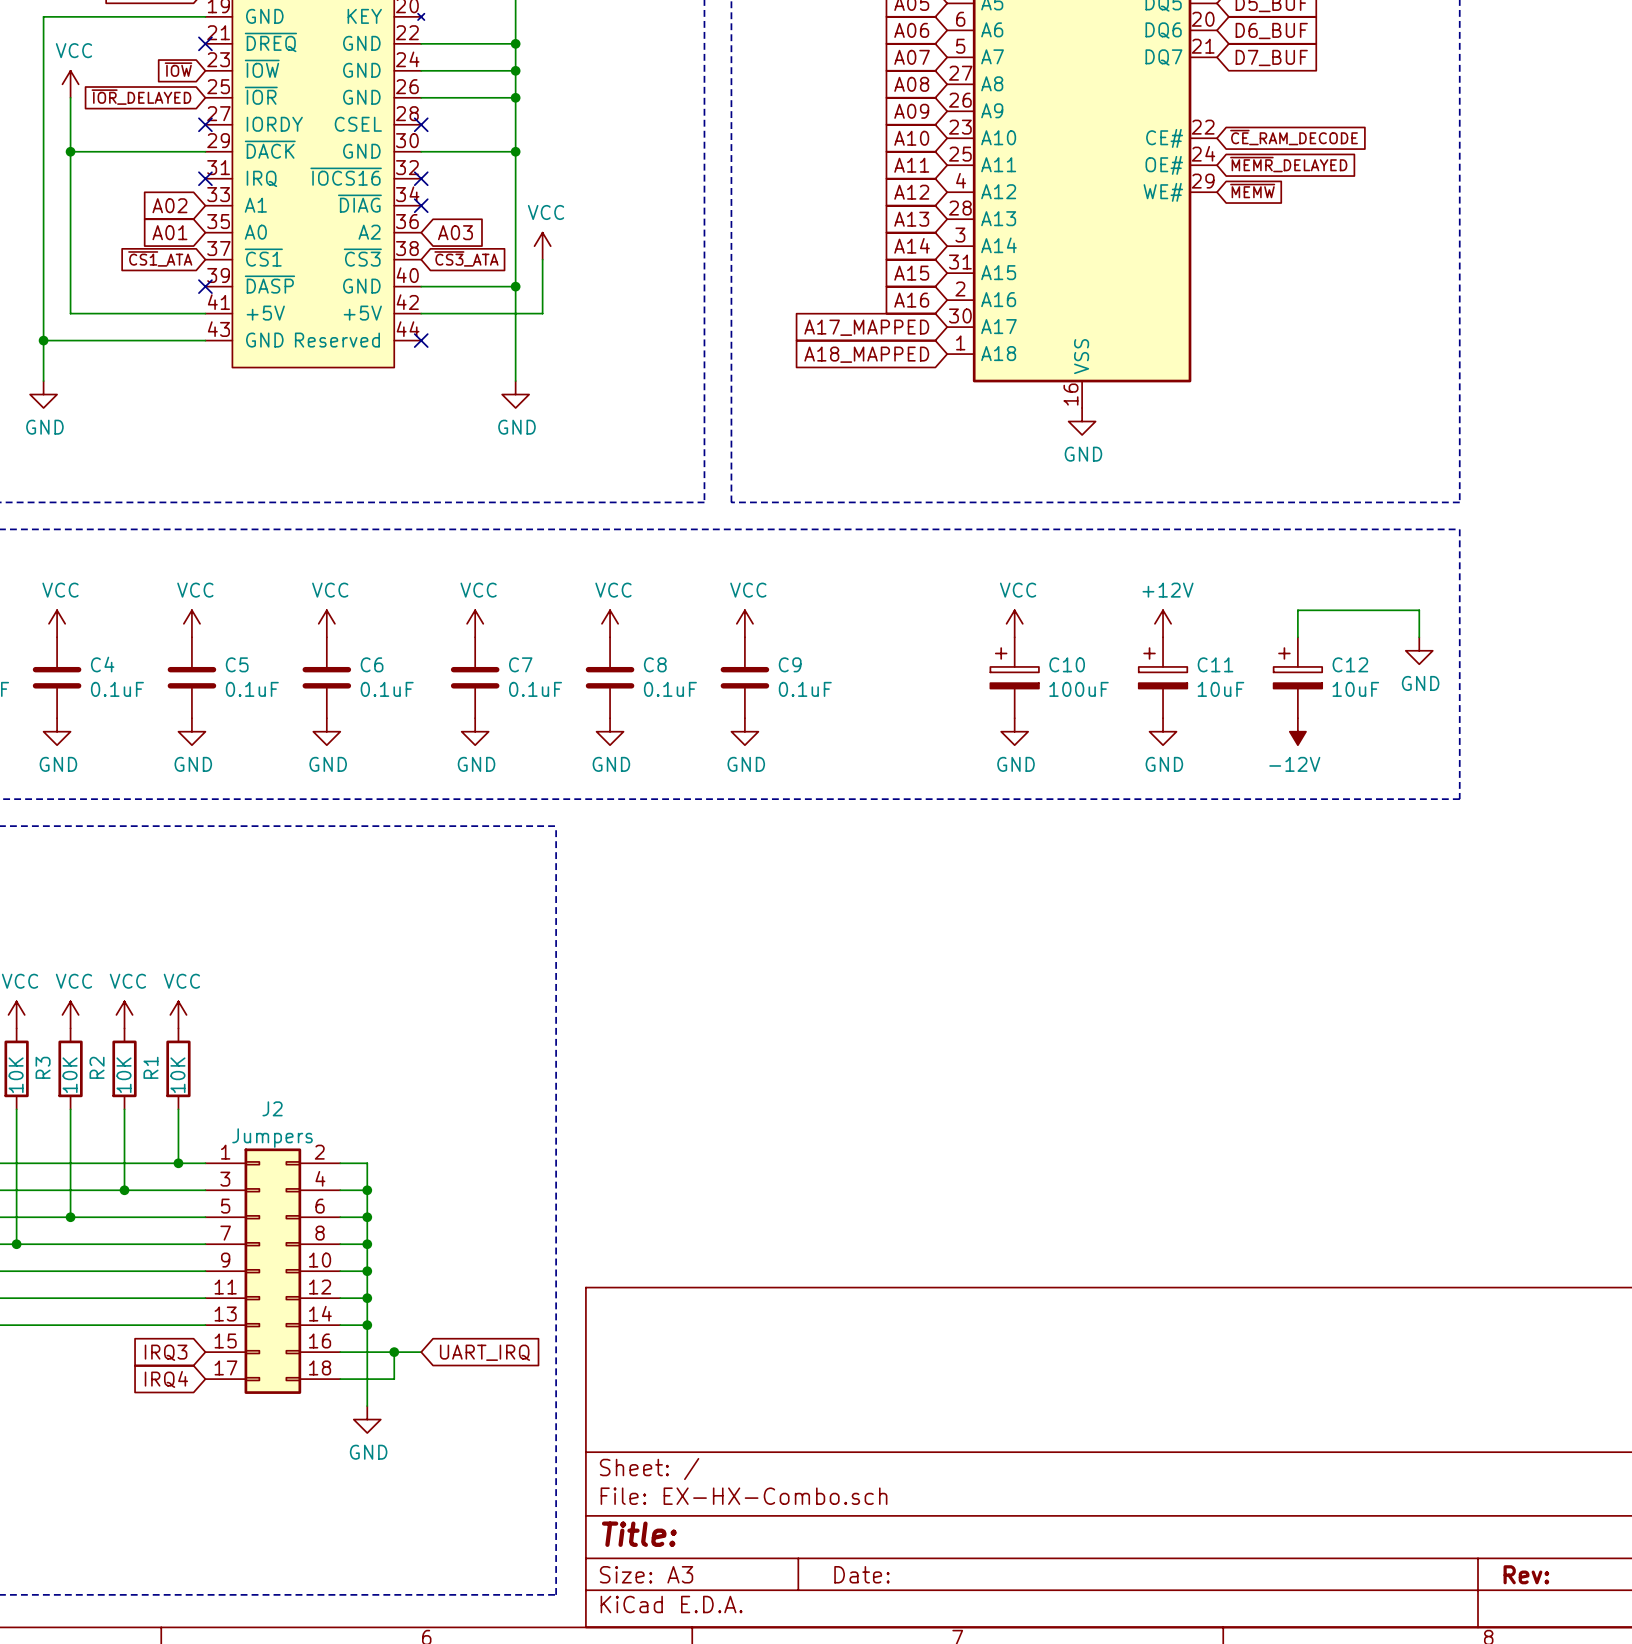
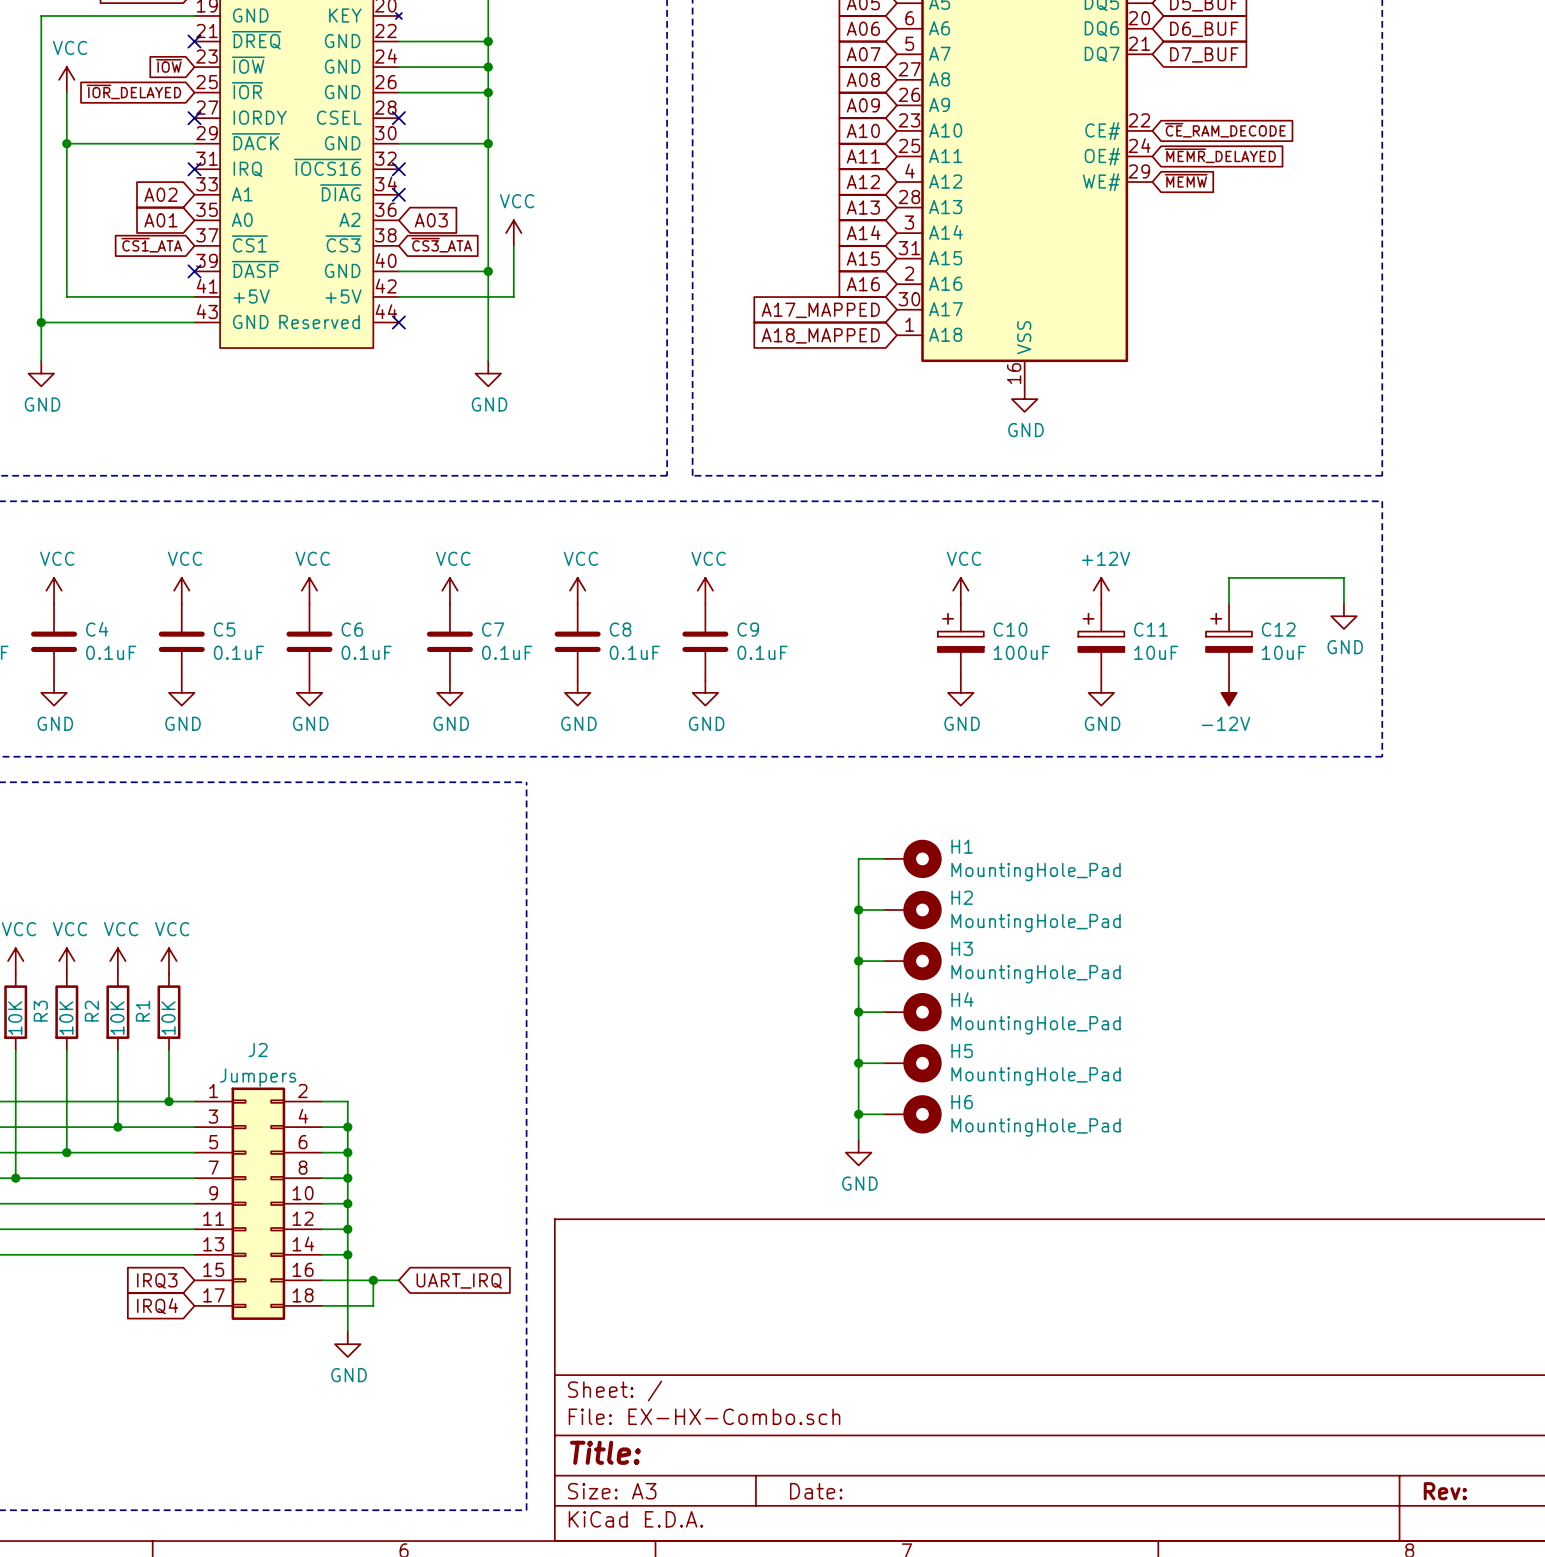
wire: none -> (884, 858) (858, 858) (858, 1139)
H1: none -> MountingHole_Pad (912, 858)
wire: none -> (858, 909) (884, 909)
junction: none -> (858, 909)
H2: none -> MountingHole_Pad (912, 909)
wire: none -> (858, 961) (884, 961)
junction: none -> (858, 961)
H3: none -> MountingHole_Pad (912, 961)
wire: none -> (858, 1012) (884, 1012)
junction: none -> (858, 1012)
H4: none -> MountingHole_Pad (912, 1012)
wire: none -> (858, 1063) (884, 1063)
junction: none -> (858, 1063)
H5: none -> MountingHole_Pad (912, 1063)
wire: none -> (858, 1114) (884, 1114)
junction: none -> (858, 1114)
H6: none -> MountingHole_Pad (912, 1114)
power symbol: none -> GND (858, 1152)

